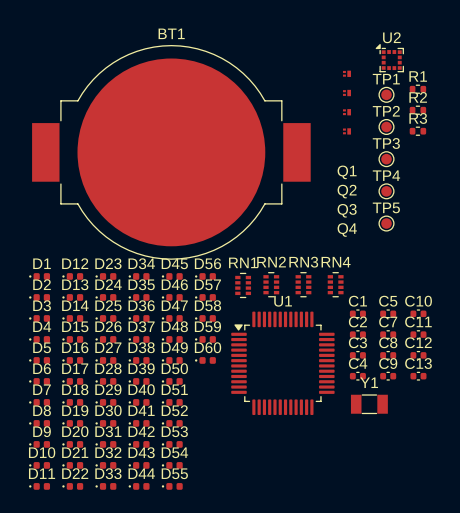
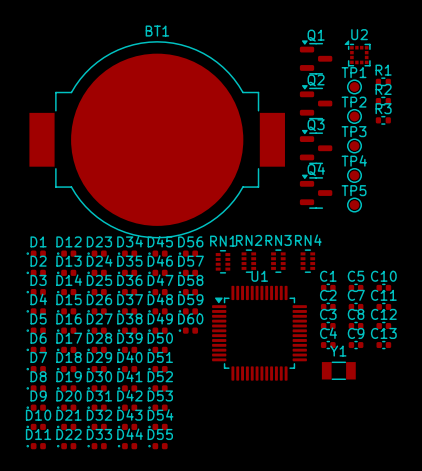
Q1 footprint: [342, 70, 351, 77] -> [299, 40, 333, 75]
Q2 footprint: [342, 89, 351, 97] -> [299, 85, 333, 120]
Q3 footprint: [342, 109, 351, 116] -> [299, 129, 333, 164]
Q4 footprint: [342, 128, 351, 135] -> [299, 174, 333, 209]
Q1 name position: Q1 (347, 172) -> Q1 (316, 35)
Q2 name position: Q2 (347, 191) -> Q2 (316, 80)
Q3 name position: Q3 (347, 210) -> Q3 (316, 125)
Q4 name position: Q4 (347, 229) -> Q4 (316, 169)

